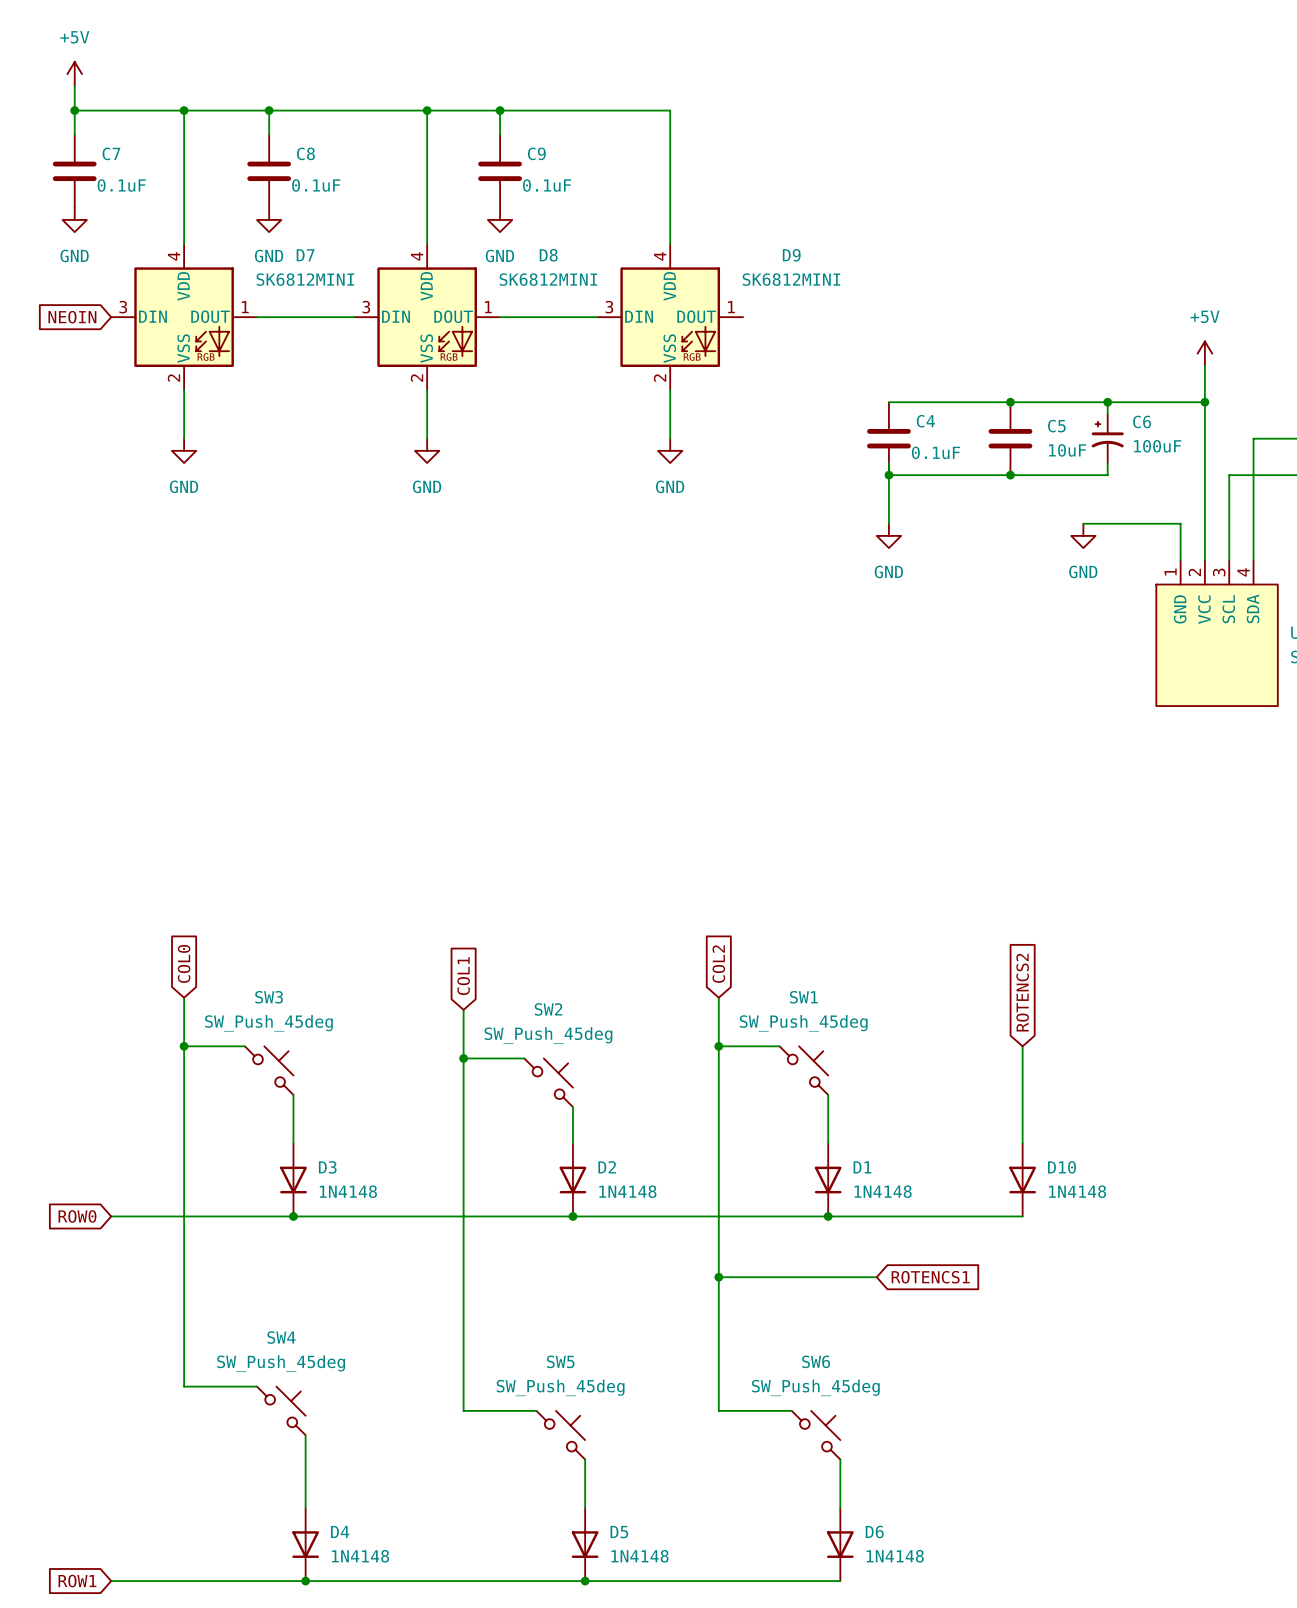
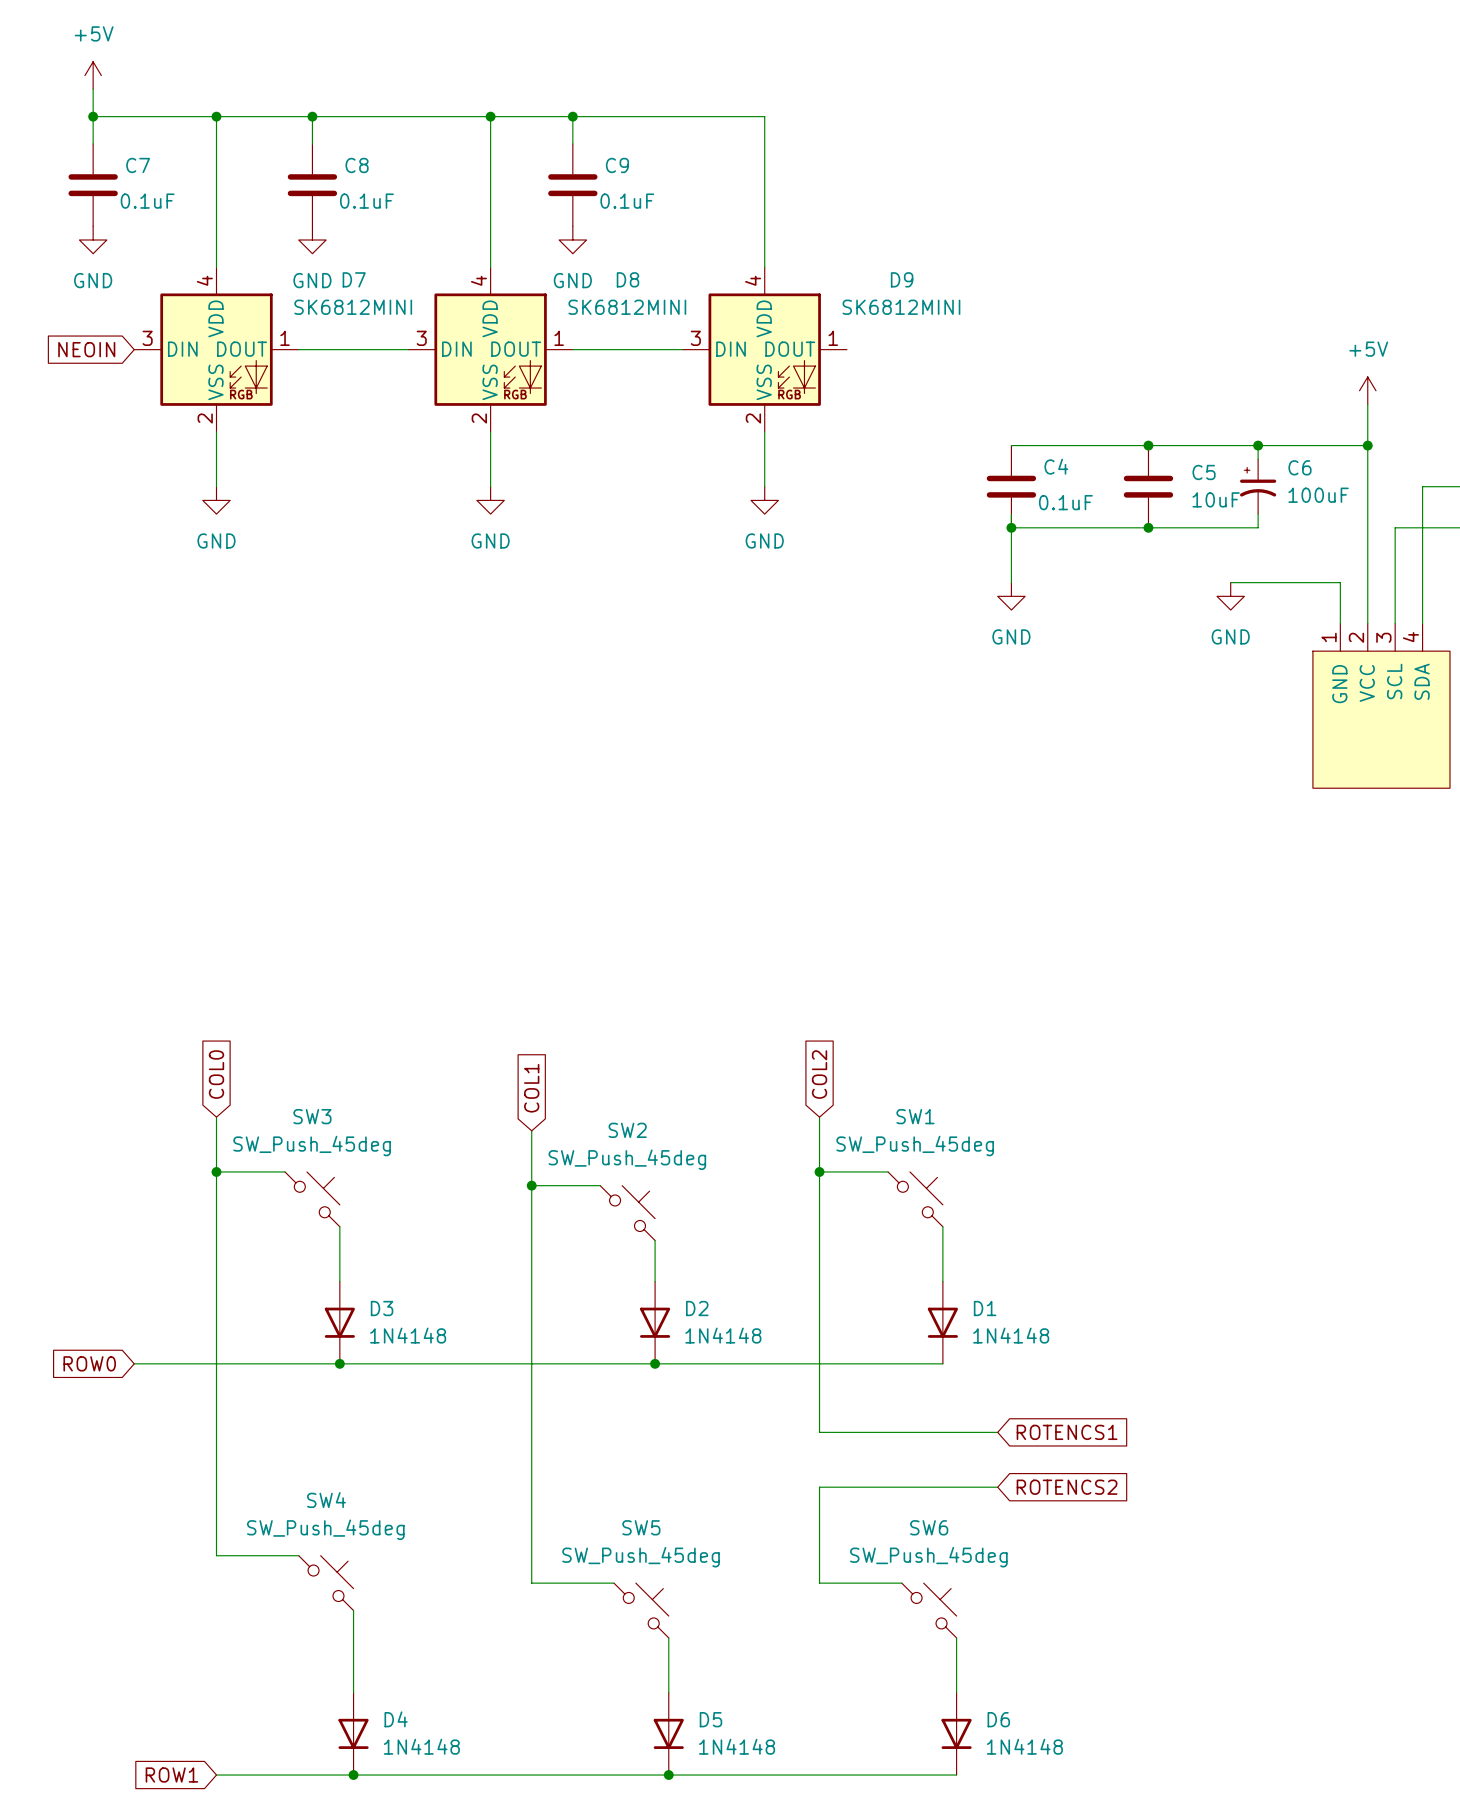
global label: ROTENCS2 (1022, 992) -> none
wire: (1022, 1046) (1022, 1143) -> none
D10: 1N4148 (1022, 1180) -> none
wire: (828, 1216) (1022, 1216) -> none
junction: (828, 1216) -> none
wire: (718, 1277) (718, 1325) -> (997, 1487) (819, 1487)
junction: (718, 1277) -> none
global label: none -> ROTENCS2 (1067, 1487)
global label position: ROW1 (77, 1581) -> ROW1 (171, 1775)
wire: (111, 1581) (184, 1581) -> none

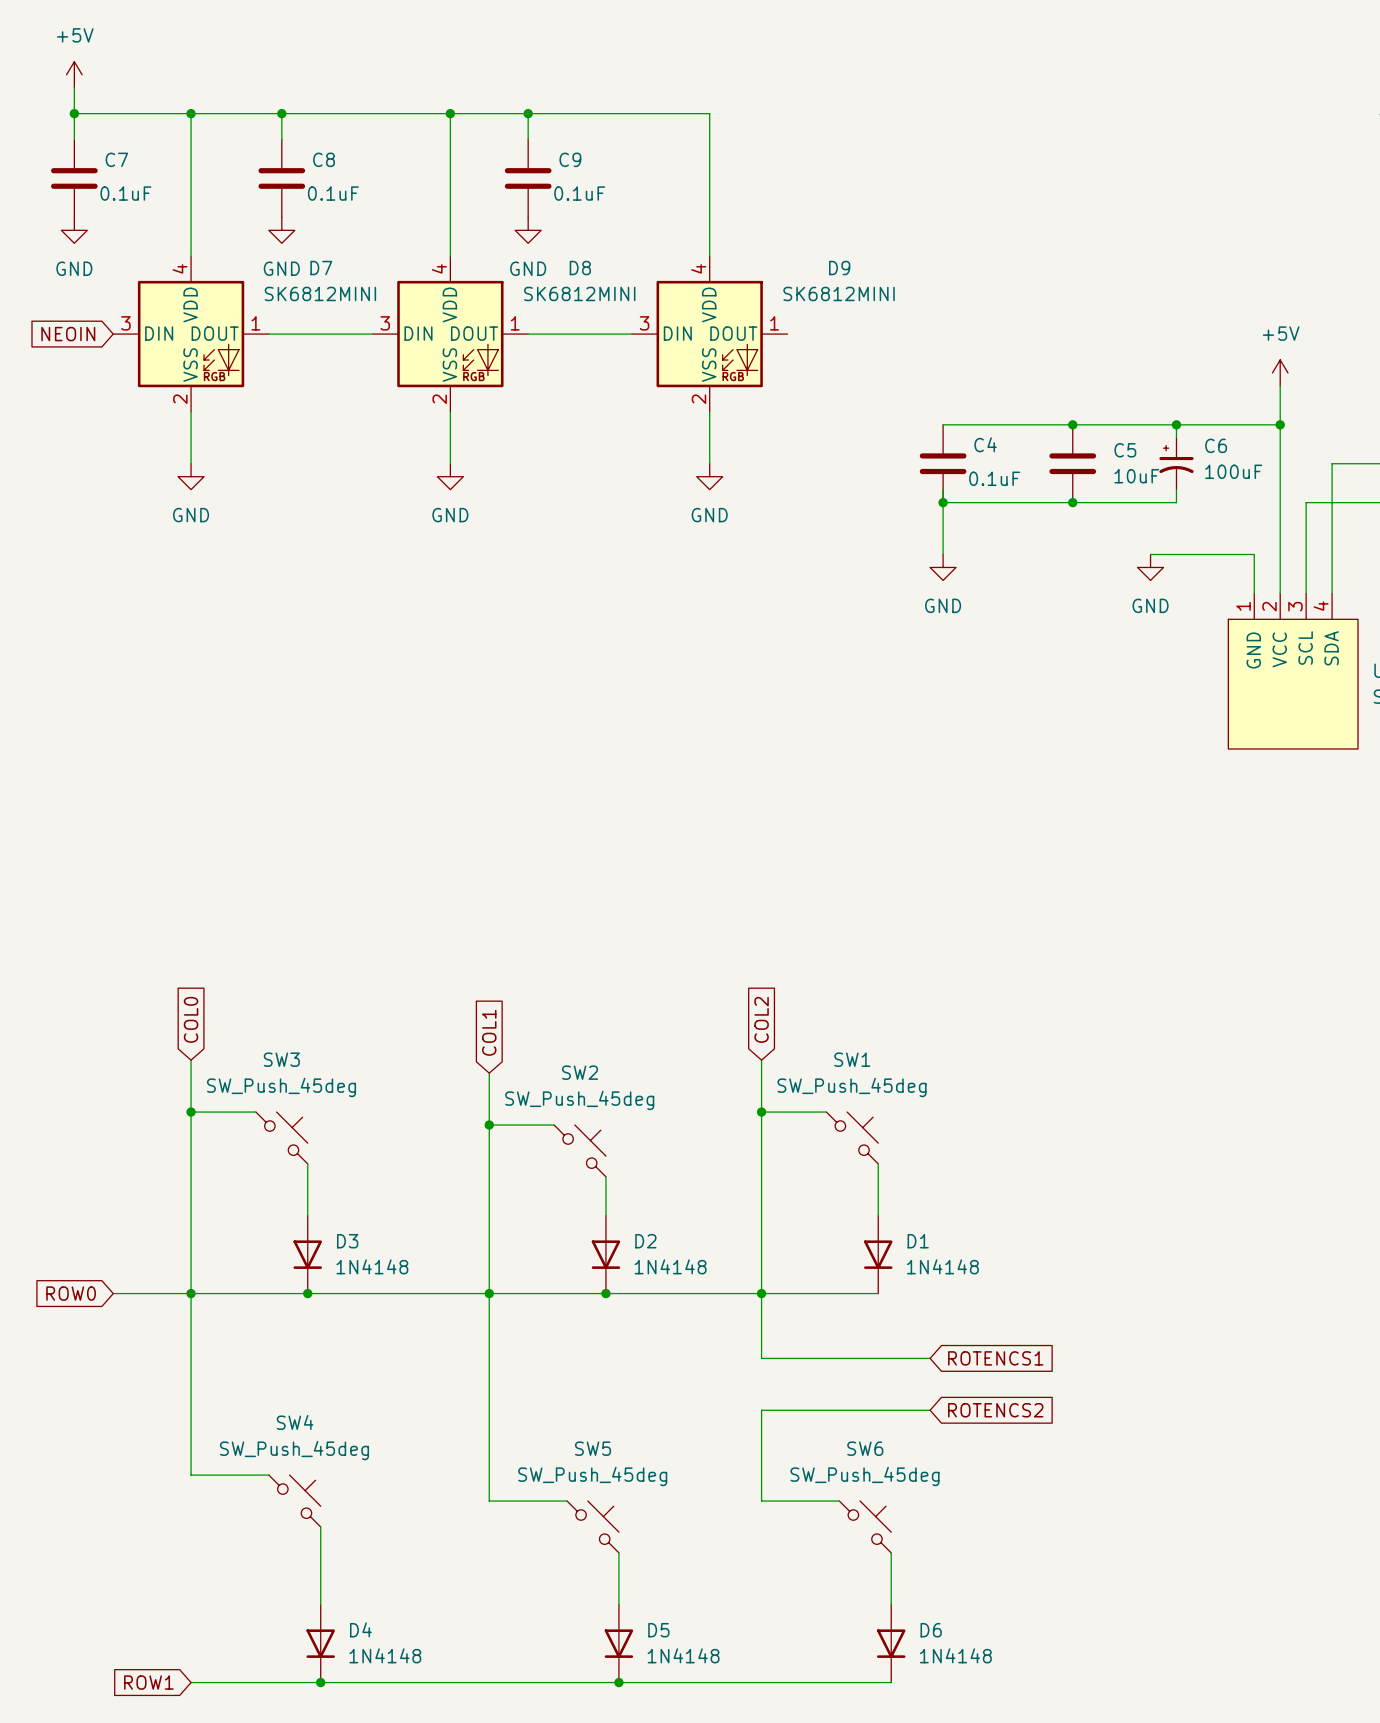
junction: none -> (191, 1293)
junction: none -> (489, 1293)
junction: none -> (761, 1293)

